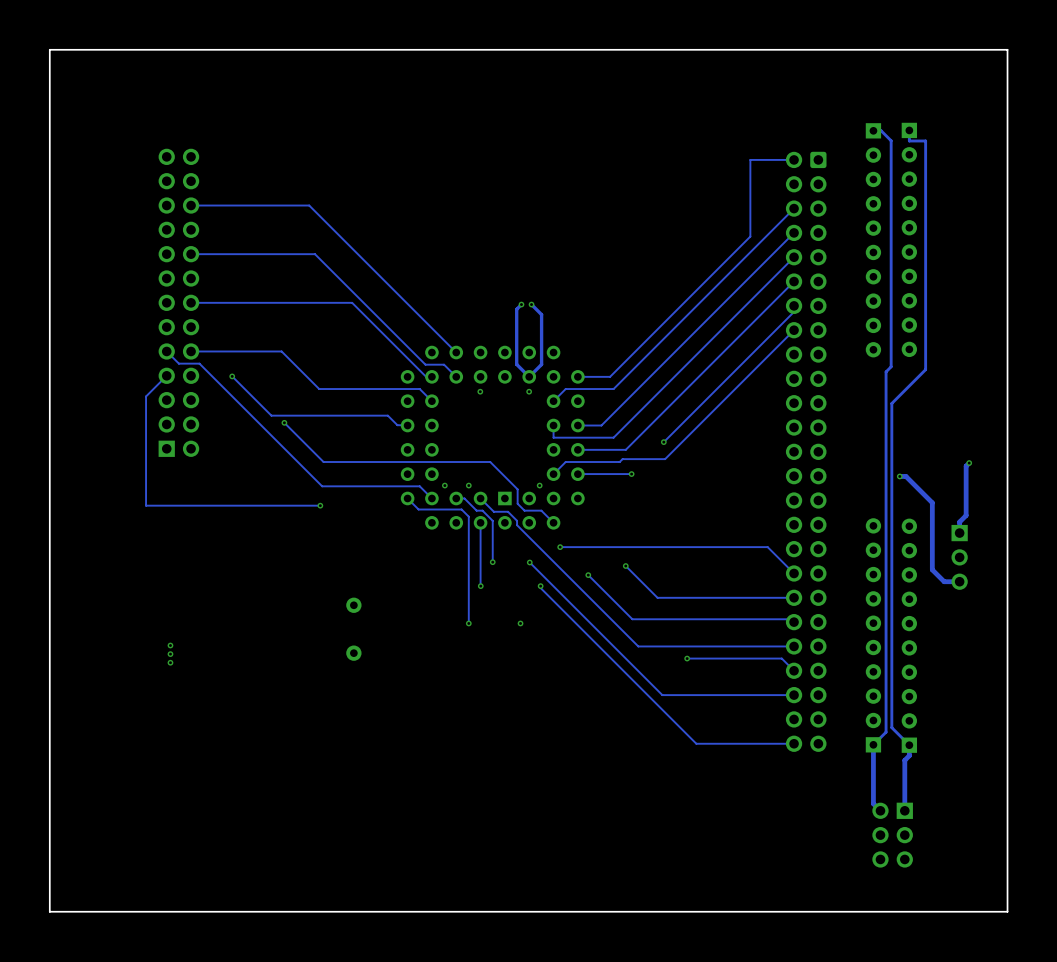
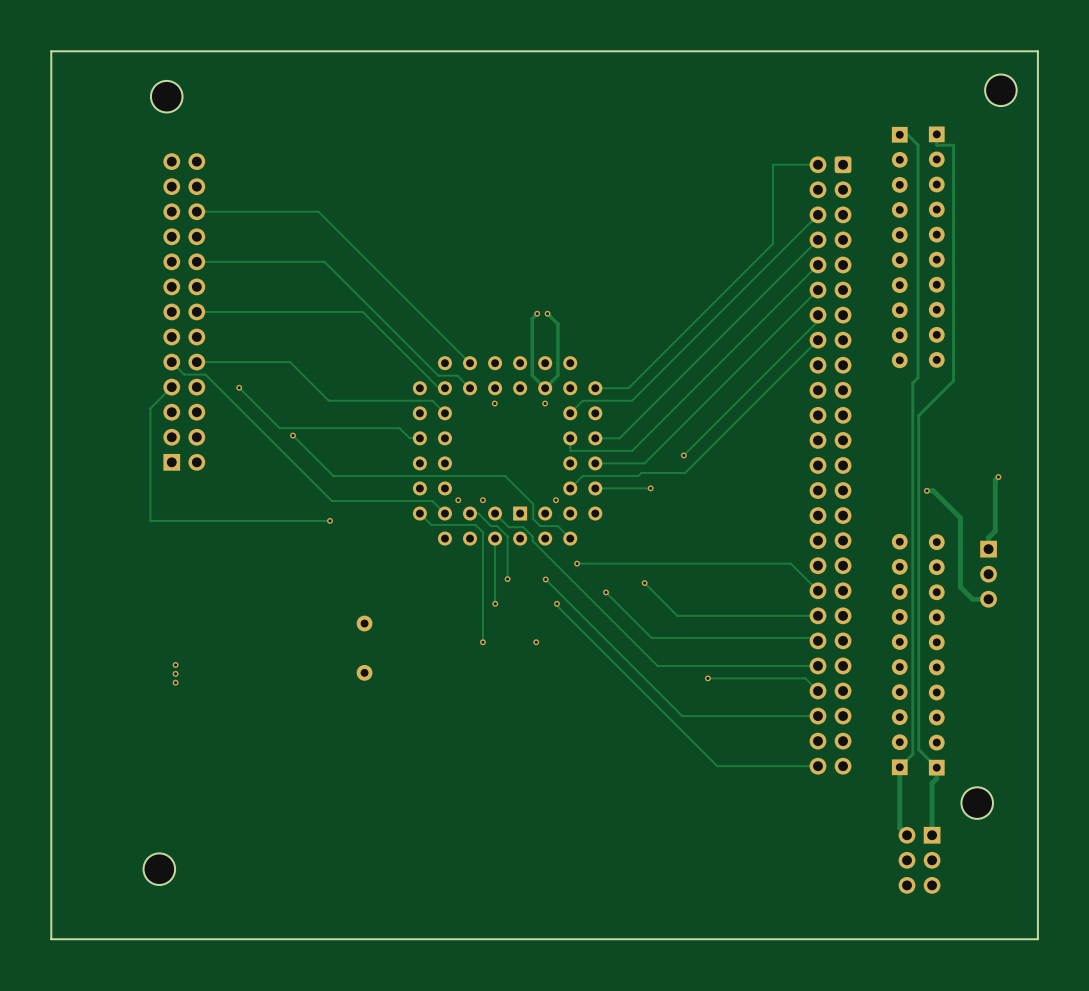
part: none -> (1000, 90)
part: none -> (166, 96)
part: none -> (977, 803)
part: none -> (159, 869)

